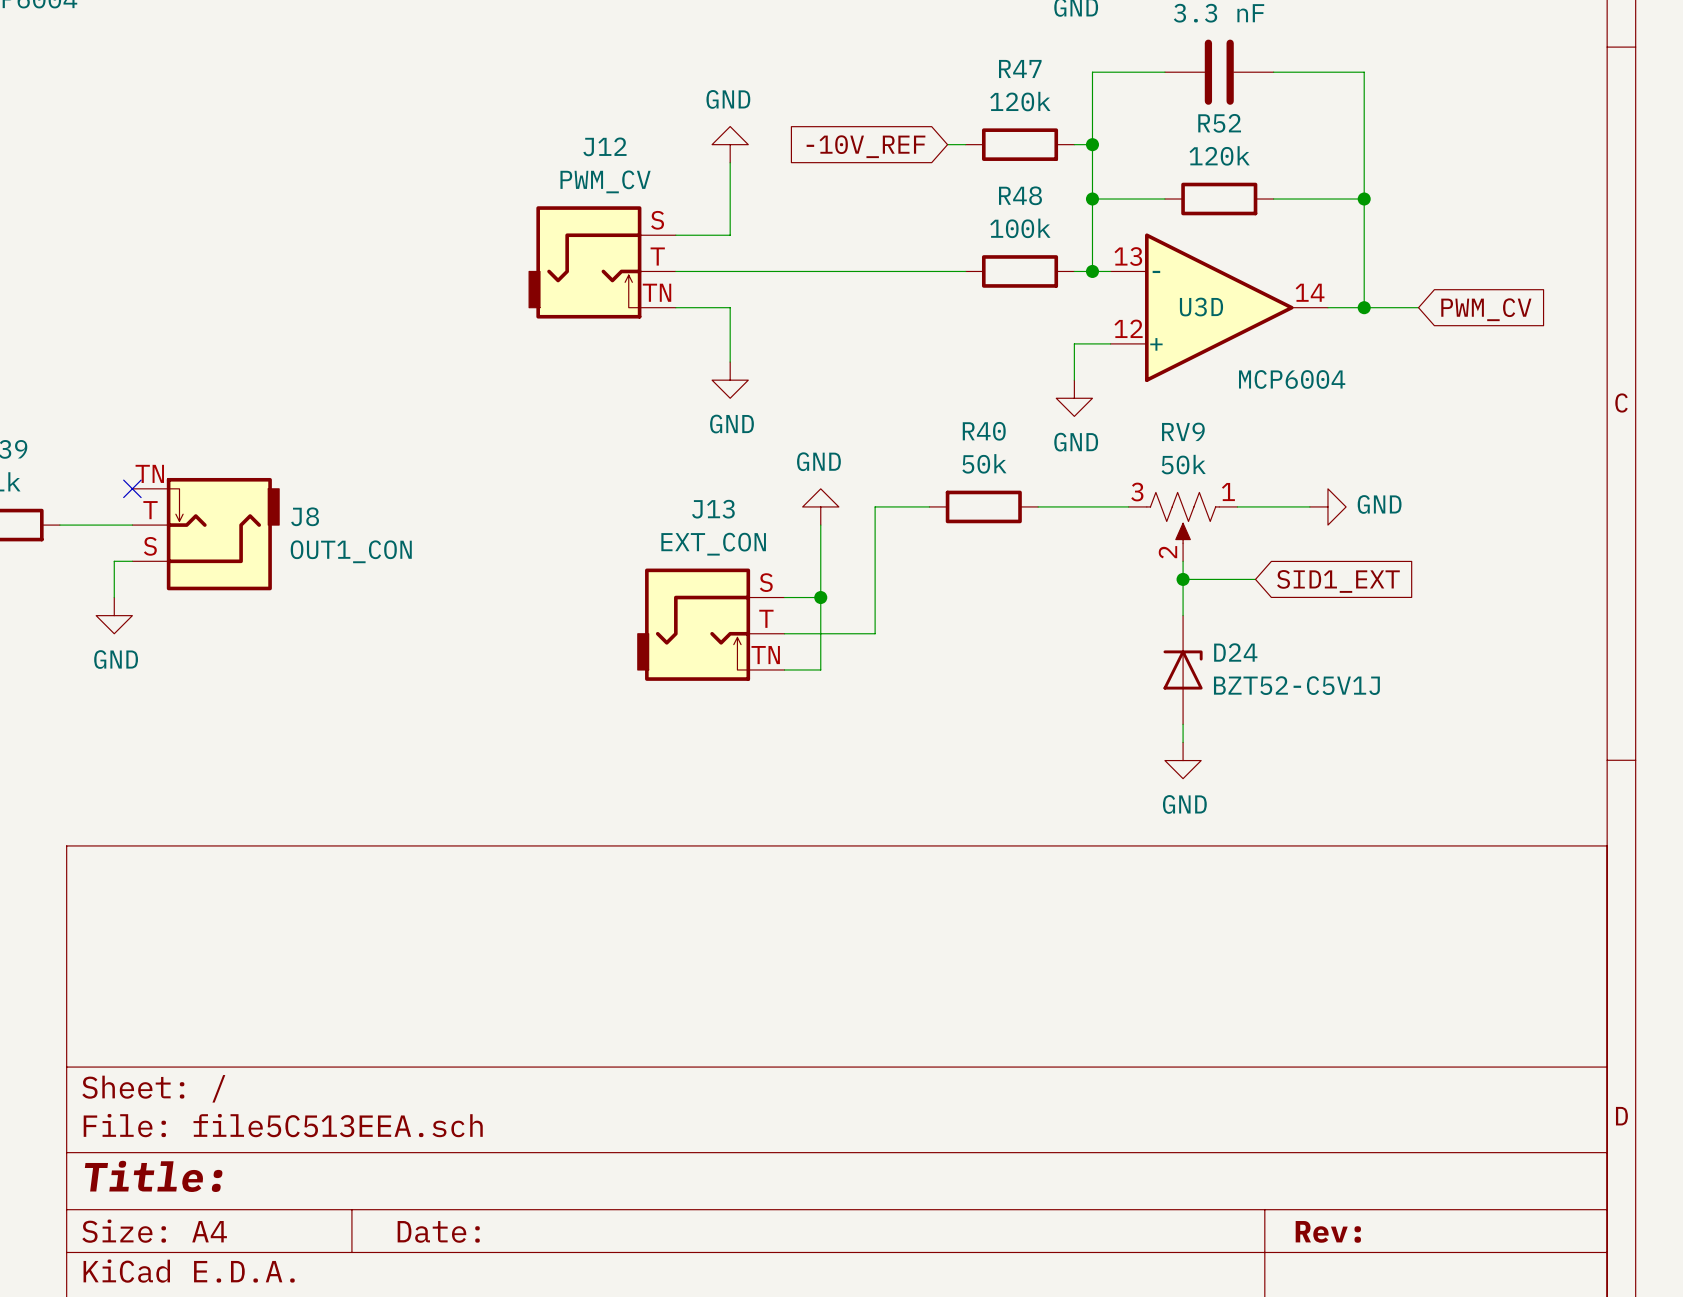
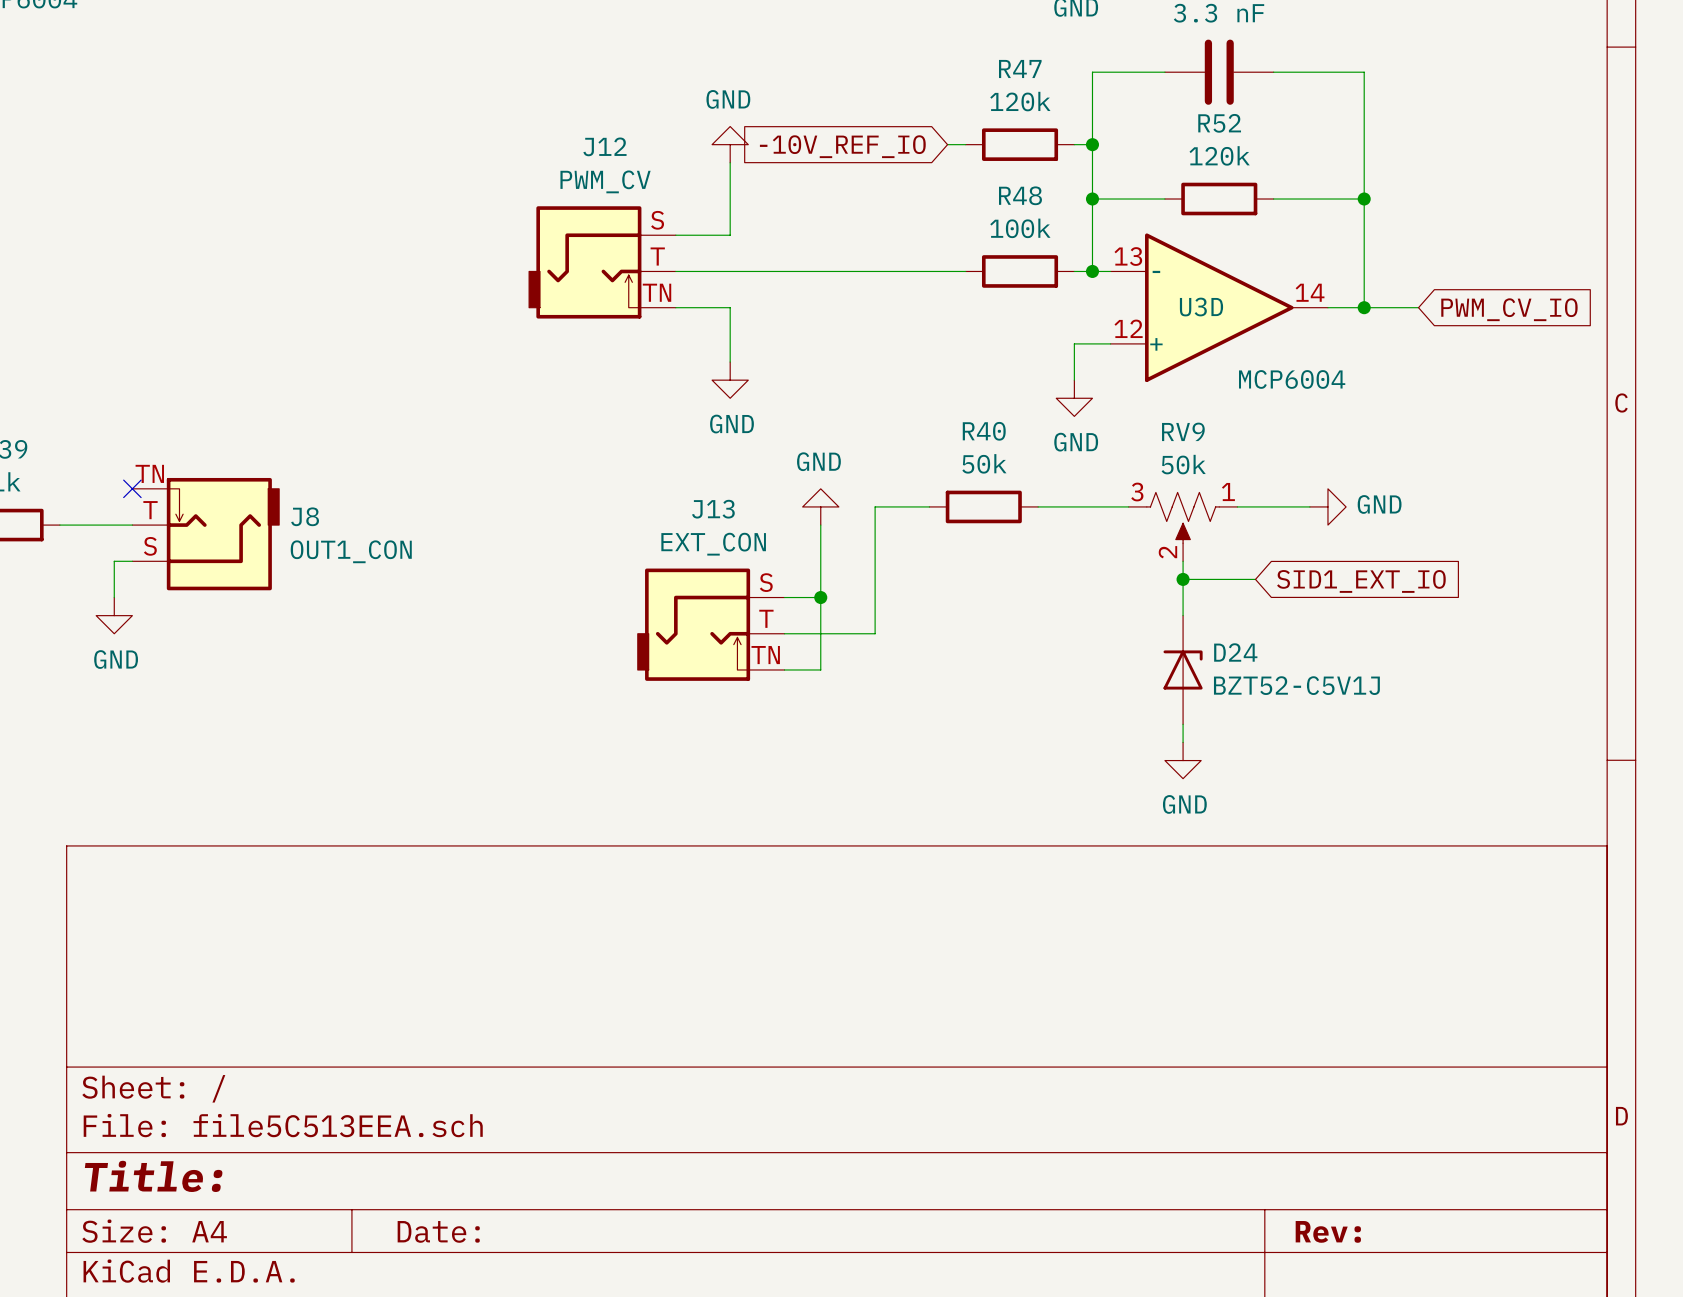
global label: -10V_REF (866, 146) -> -10V_REF_IO (842, 146)
global label: PWM_CV (1486, 309) -> PWM_CV_IO (1509, 309)
global label: SID1_EXT (1338, 581) -> SID1_EXT_IO (1361, 581)

